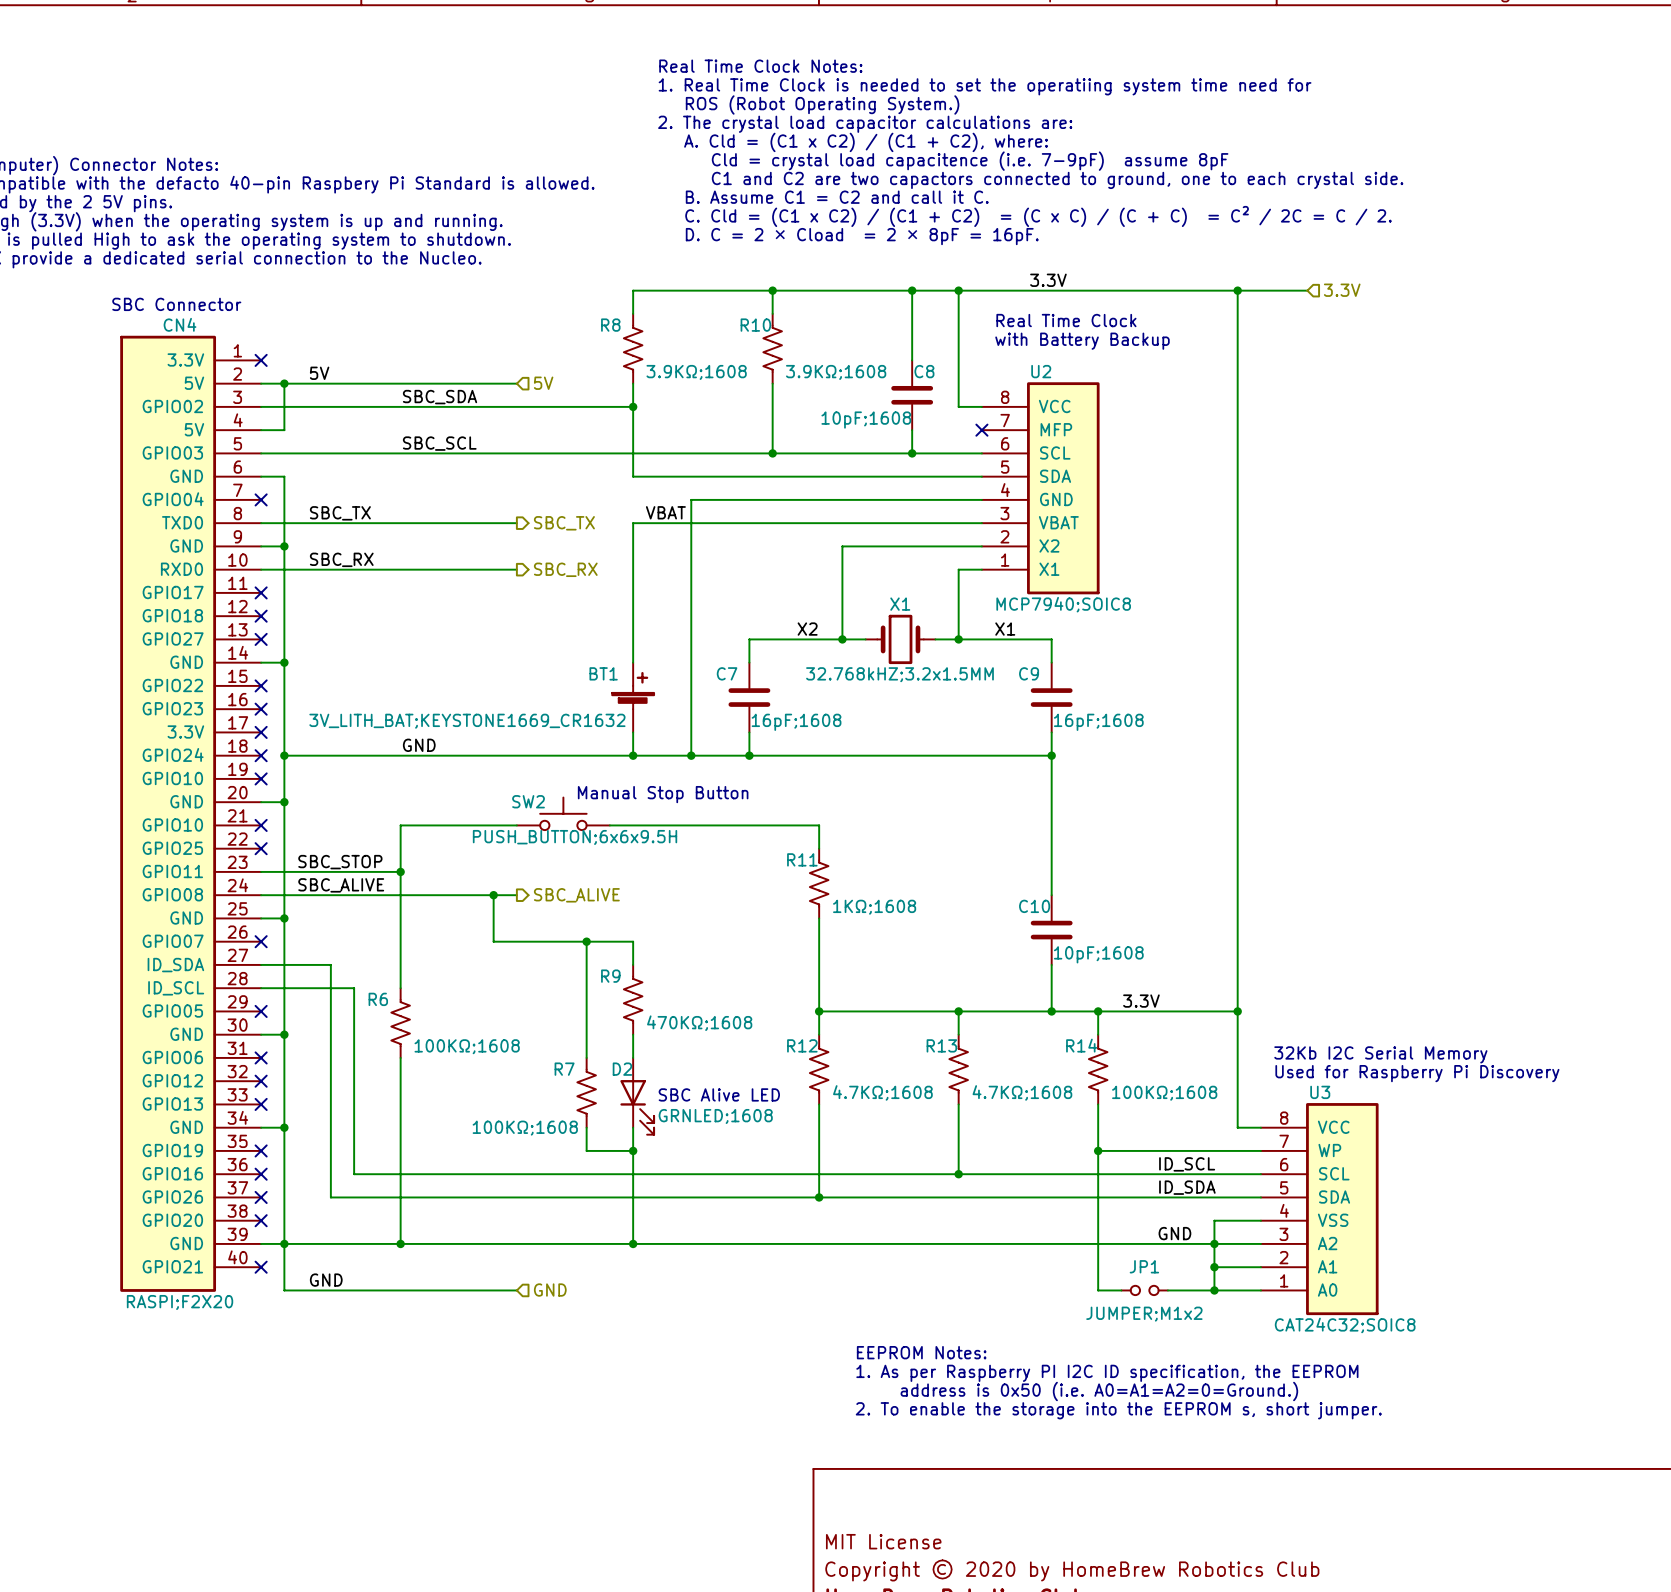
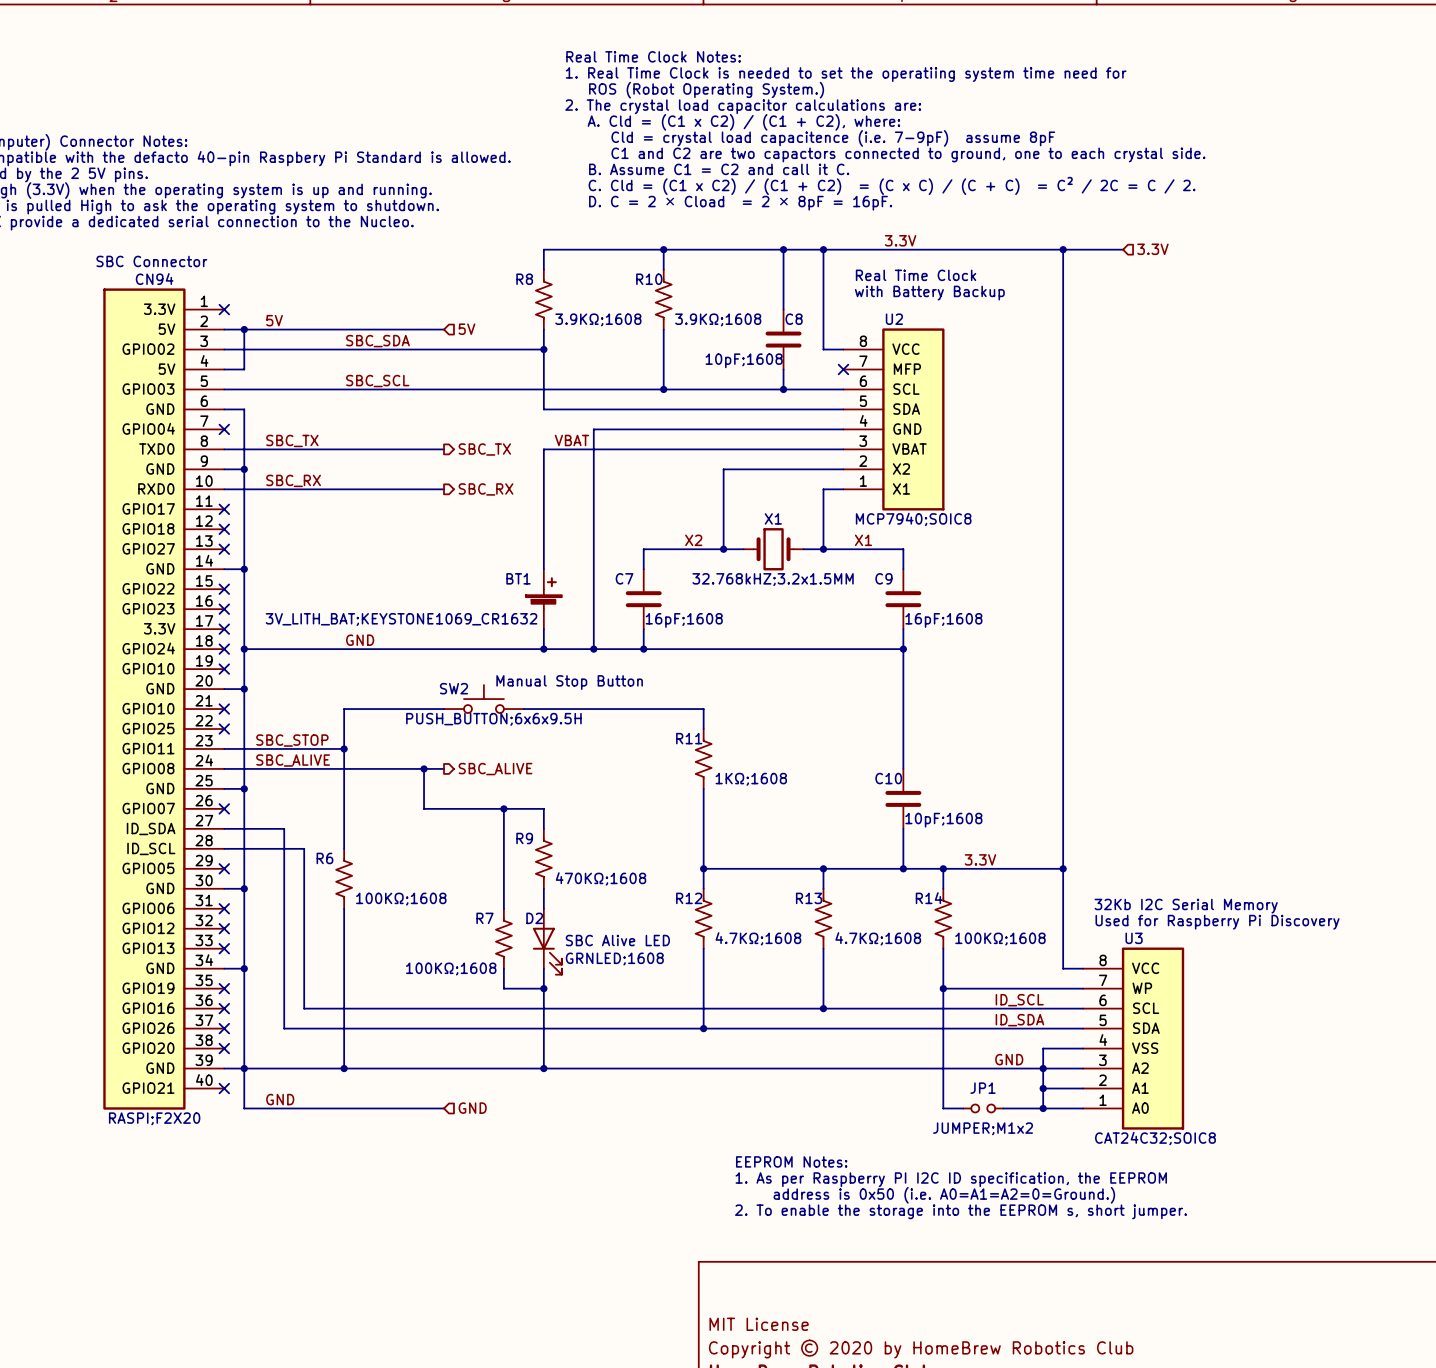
CN4 name: CN4 (180, 324) -> CN94 (154, 279)
BT1 value: 3V_LITH_BAT;KEYSTONE1669_CR1632 (467, 721) -> 3V_LITH_BAT;KEYSTONE1069_CR1632 (401, 619)

